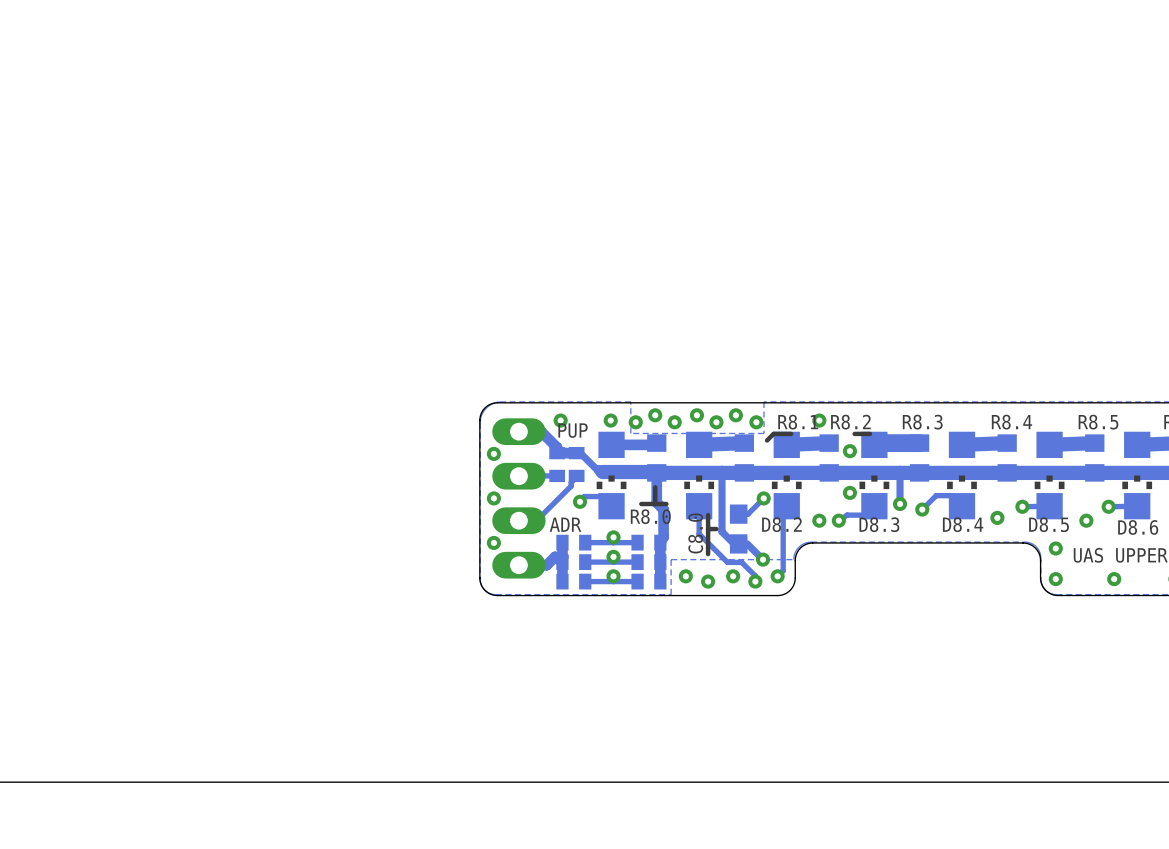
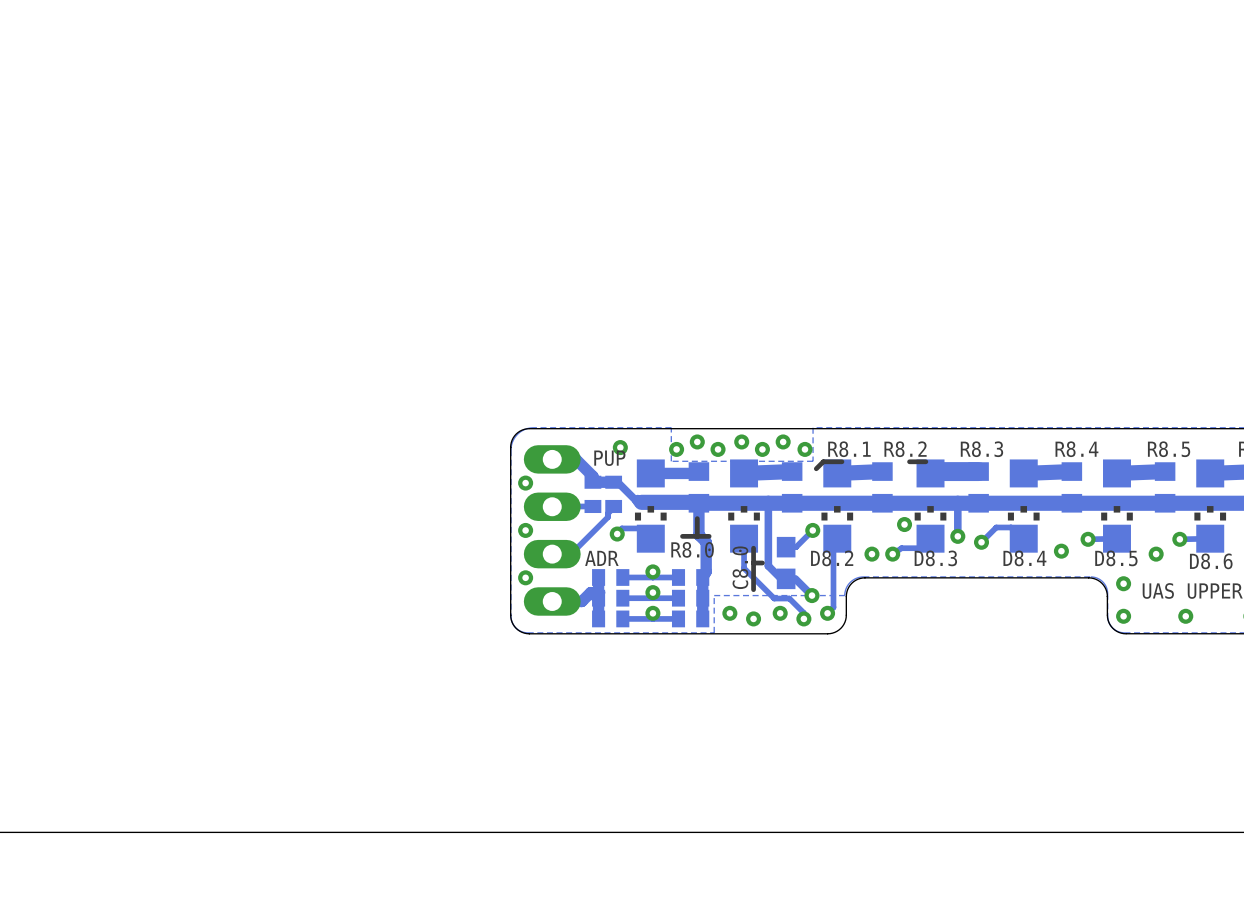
via: (560, 420) -> none
via: none -> (620, 447)
via: (610, 420) -> none
via: (819, 420) -> none
via: (849, 451) -> none

